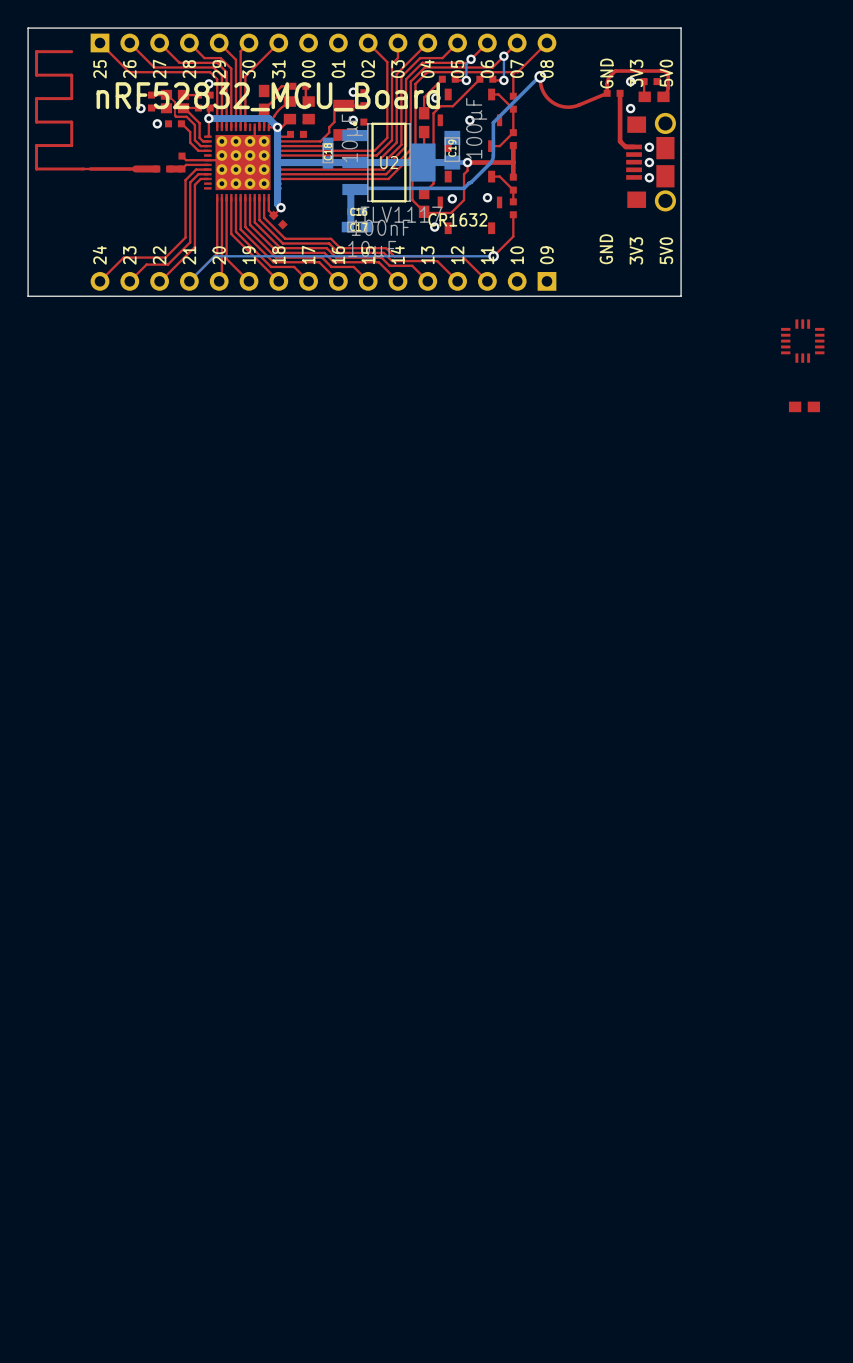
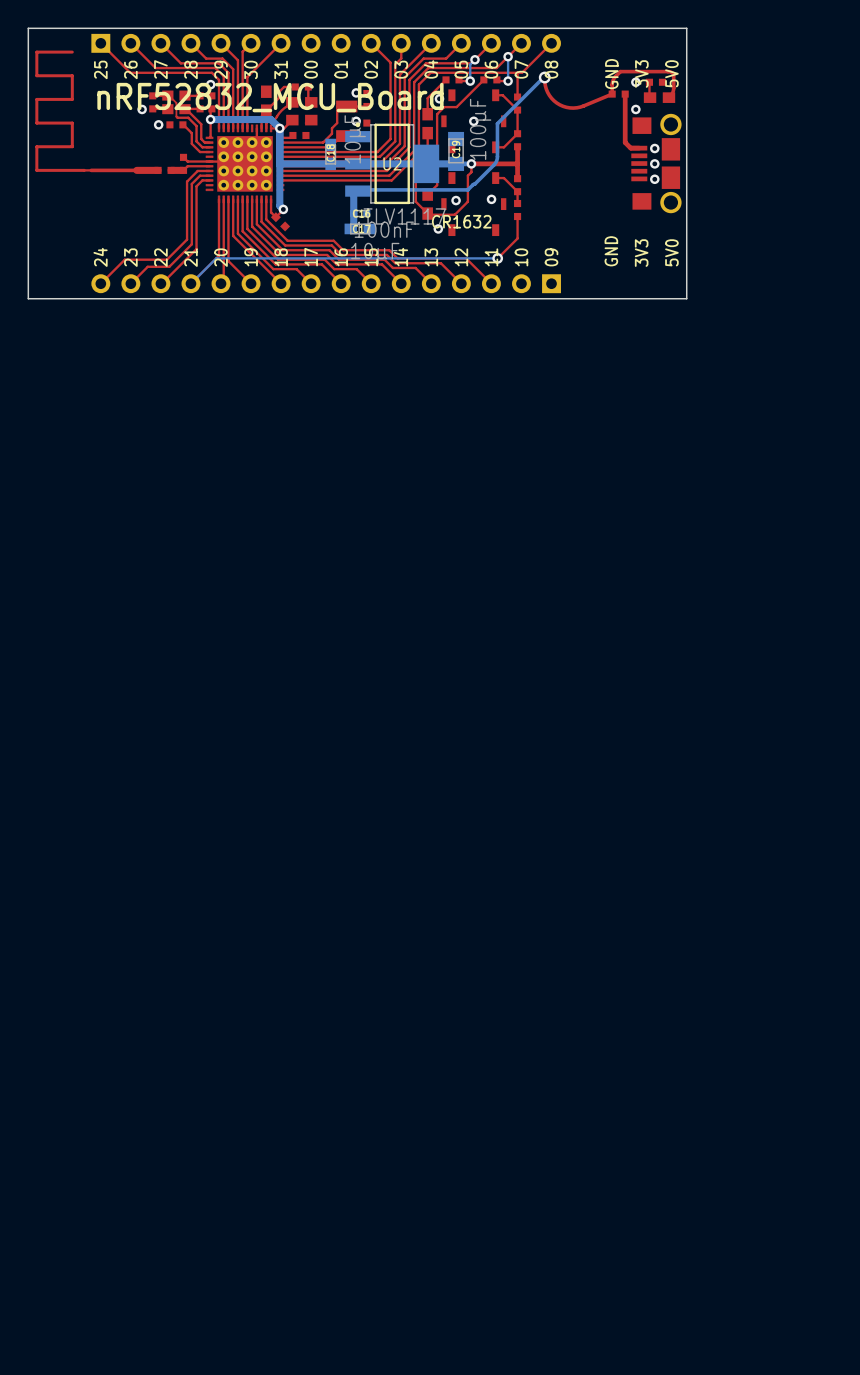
part: (802, 341) -> none
part: (804, 406) -> none

